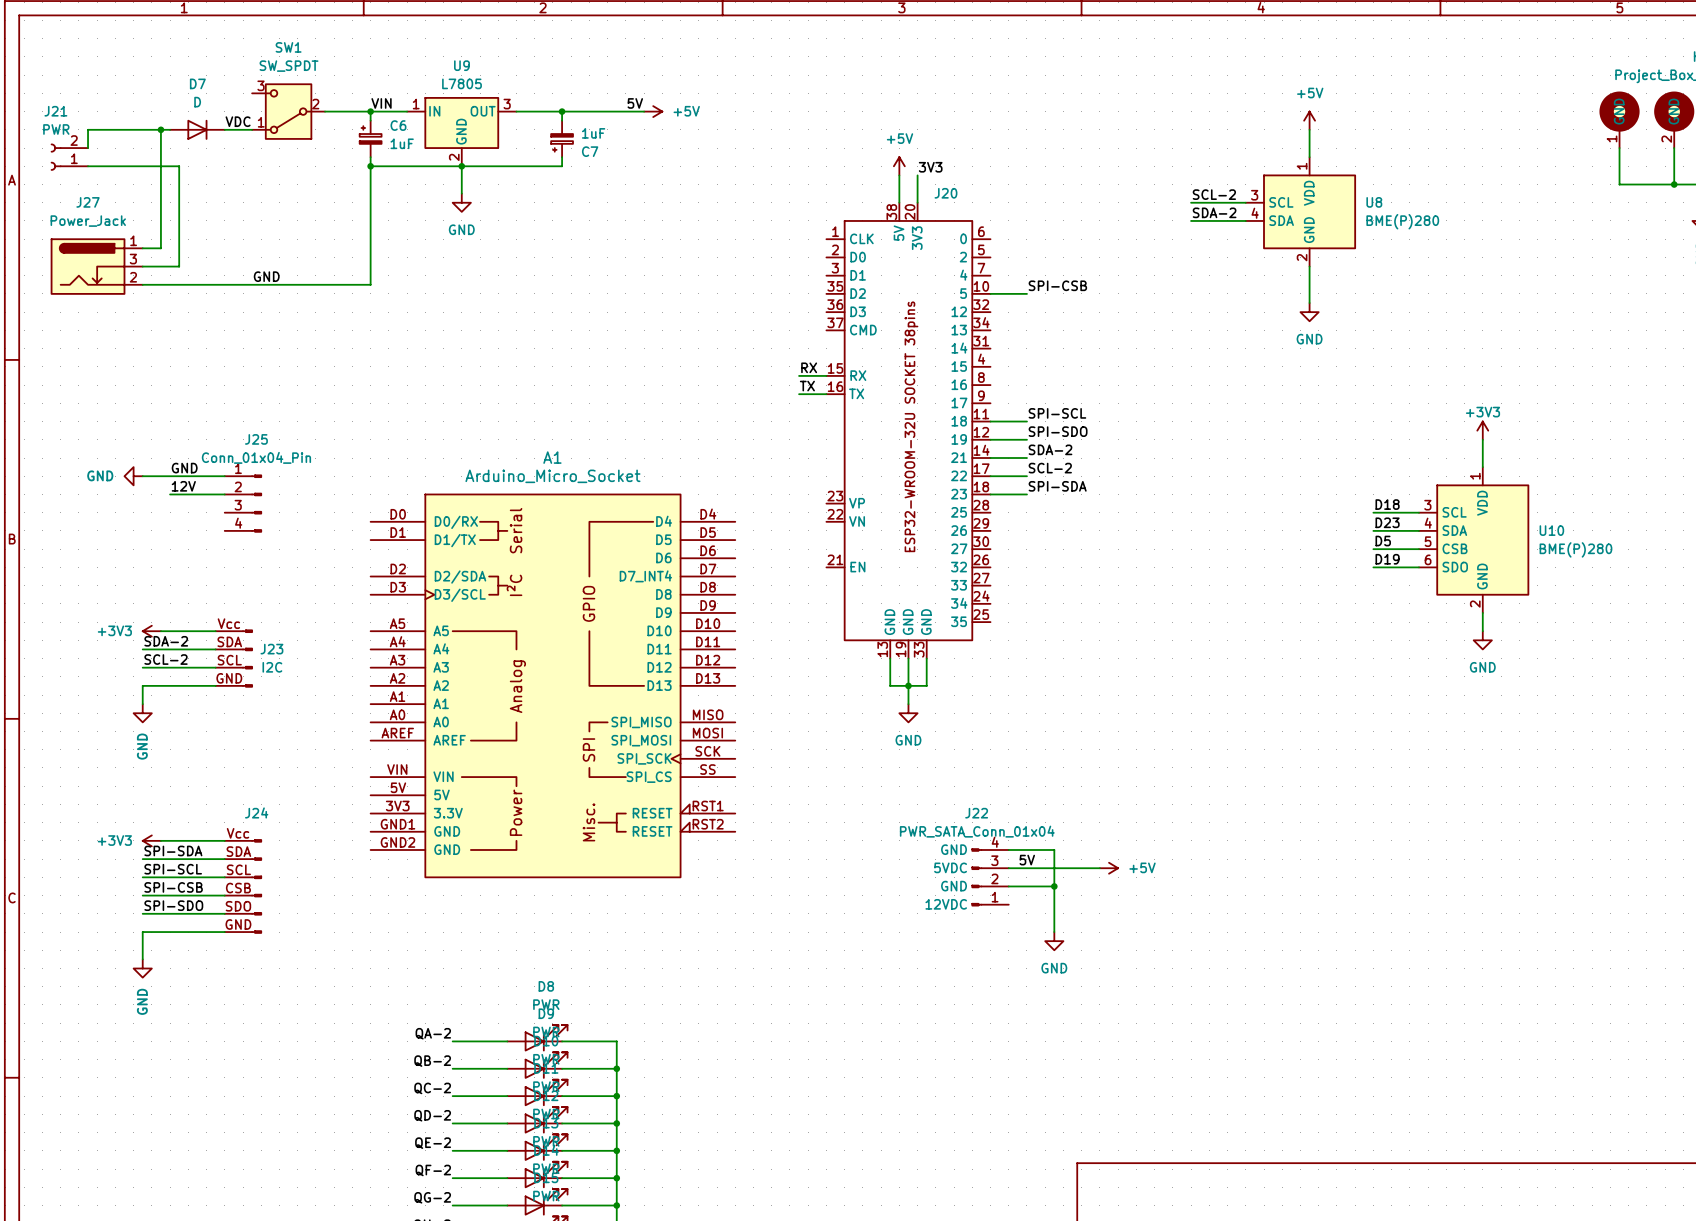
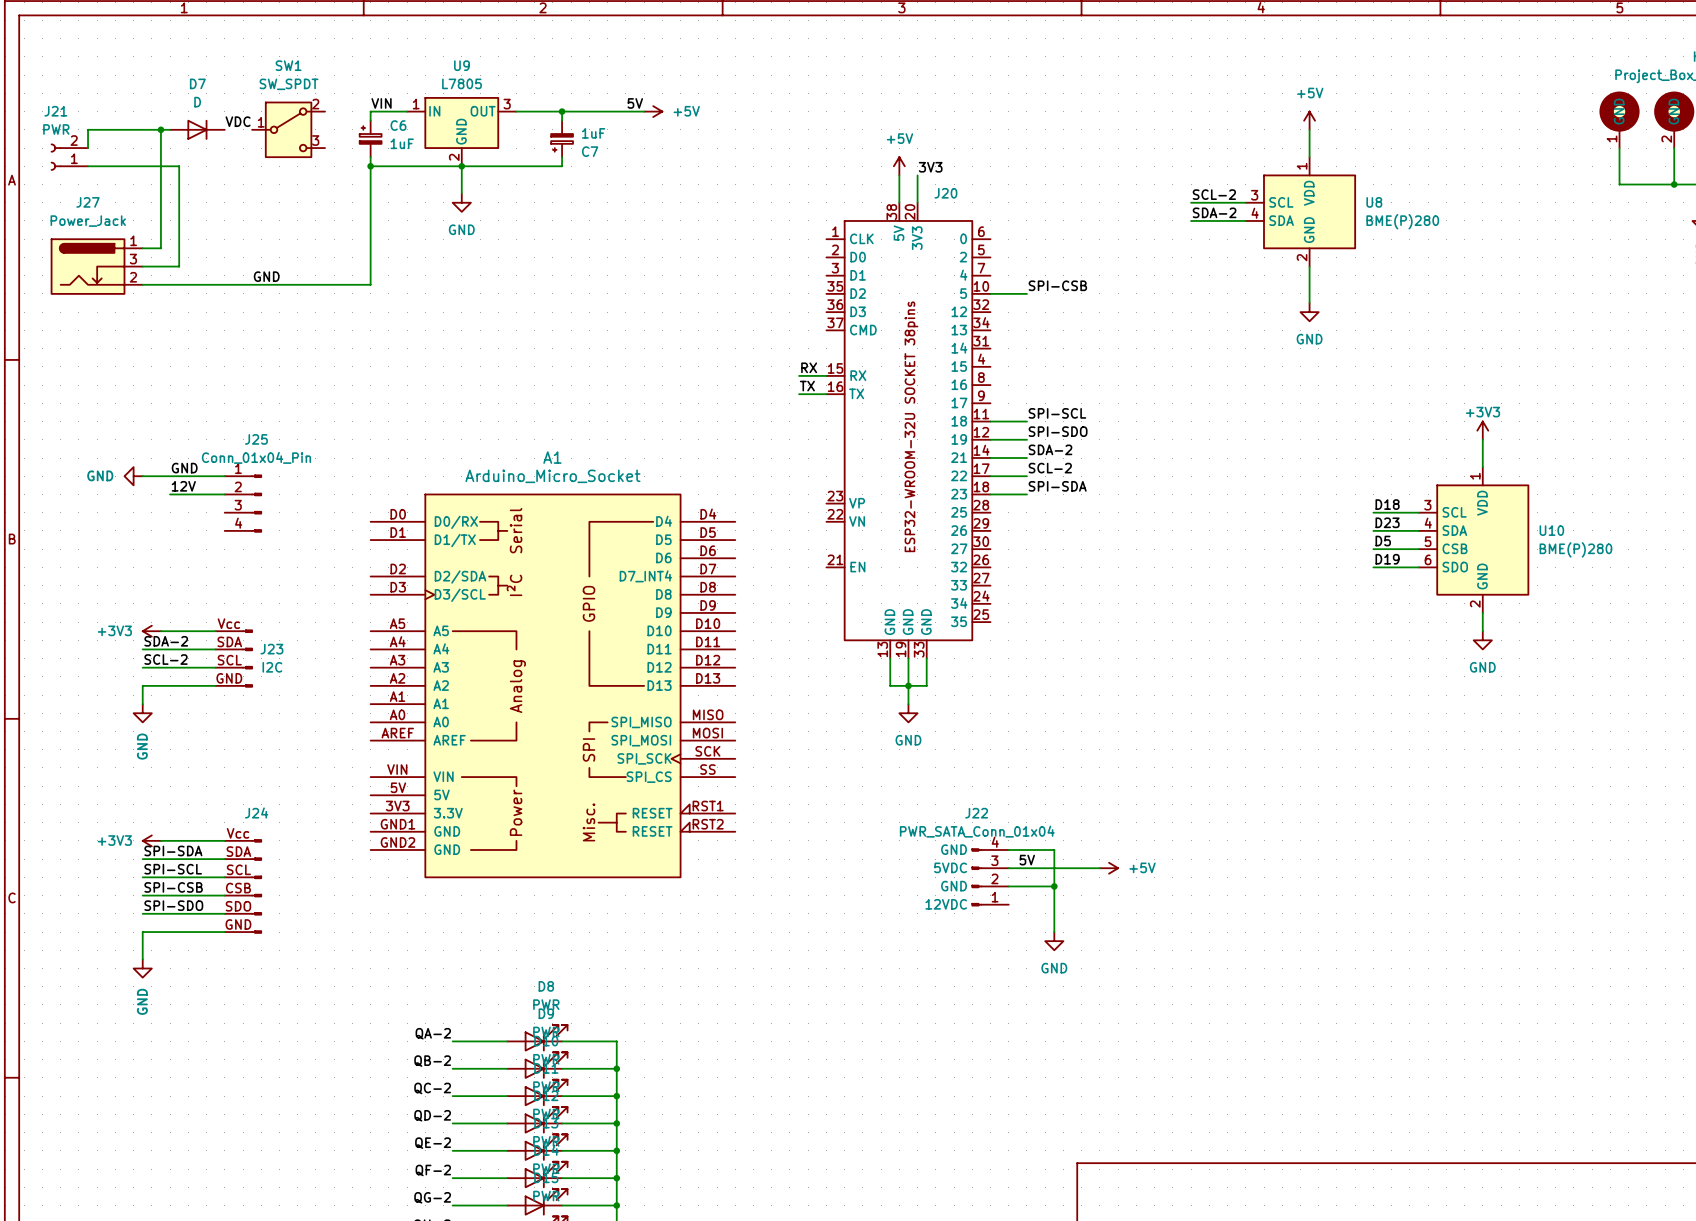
SW1 symbol: [252, 84, 326, 139] -> [252, 102, 326, 158]
wire: (325, 111) (370, 111) -> none
junction: (370, 111) -> none
wire: (224, 129) (252, 129) -> none

